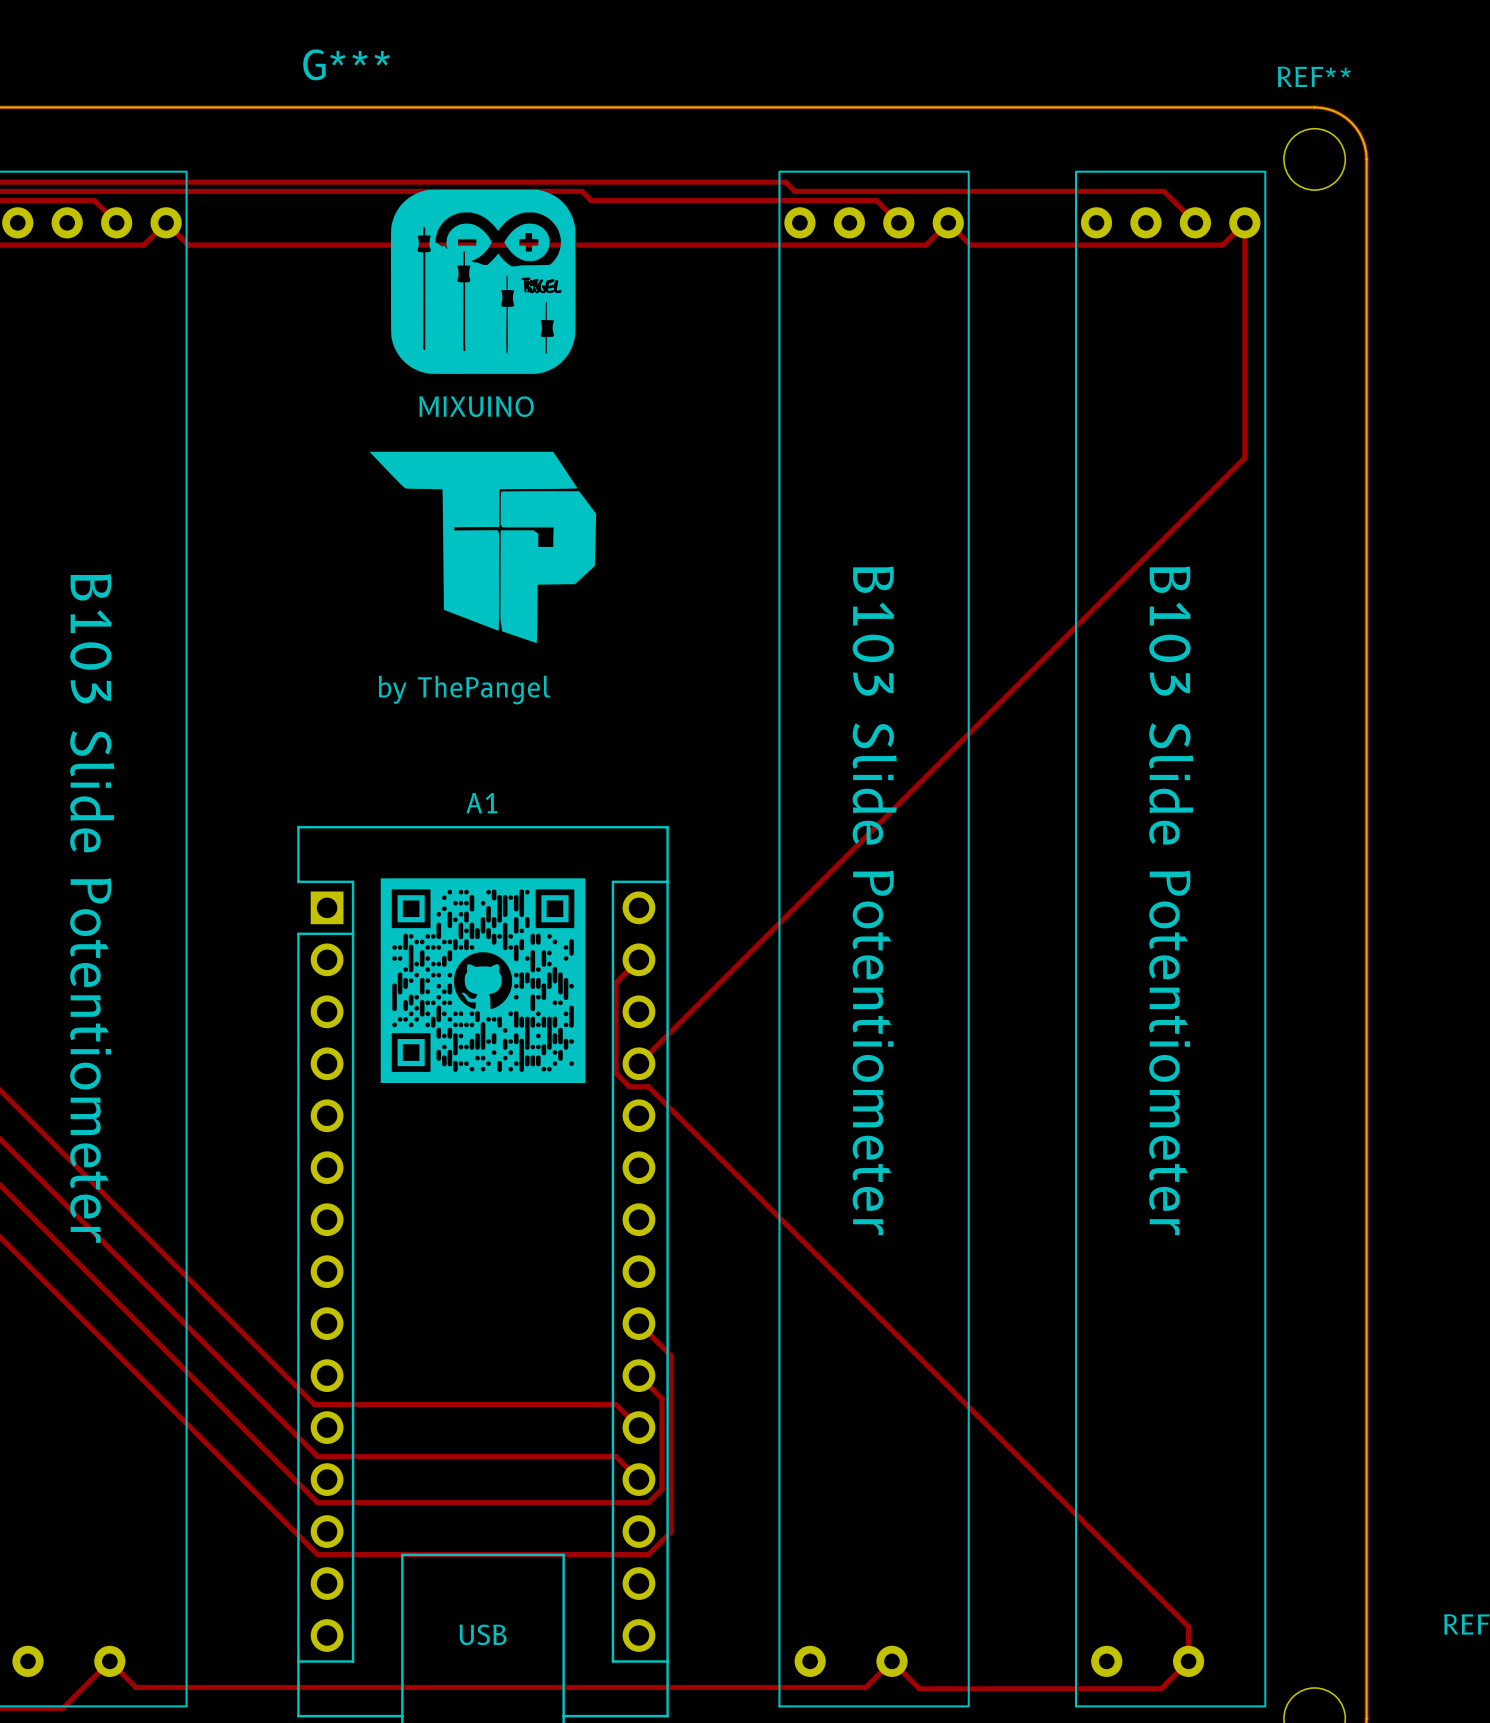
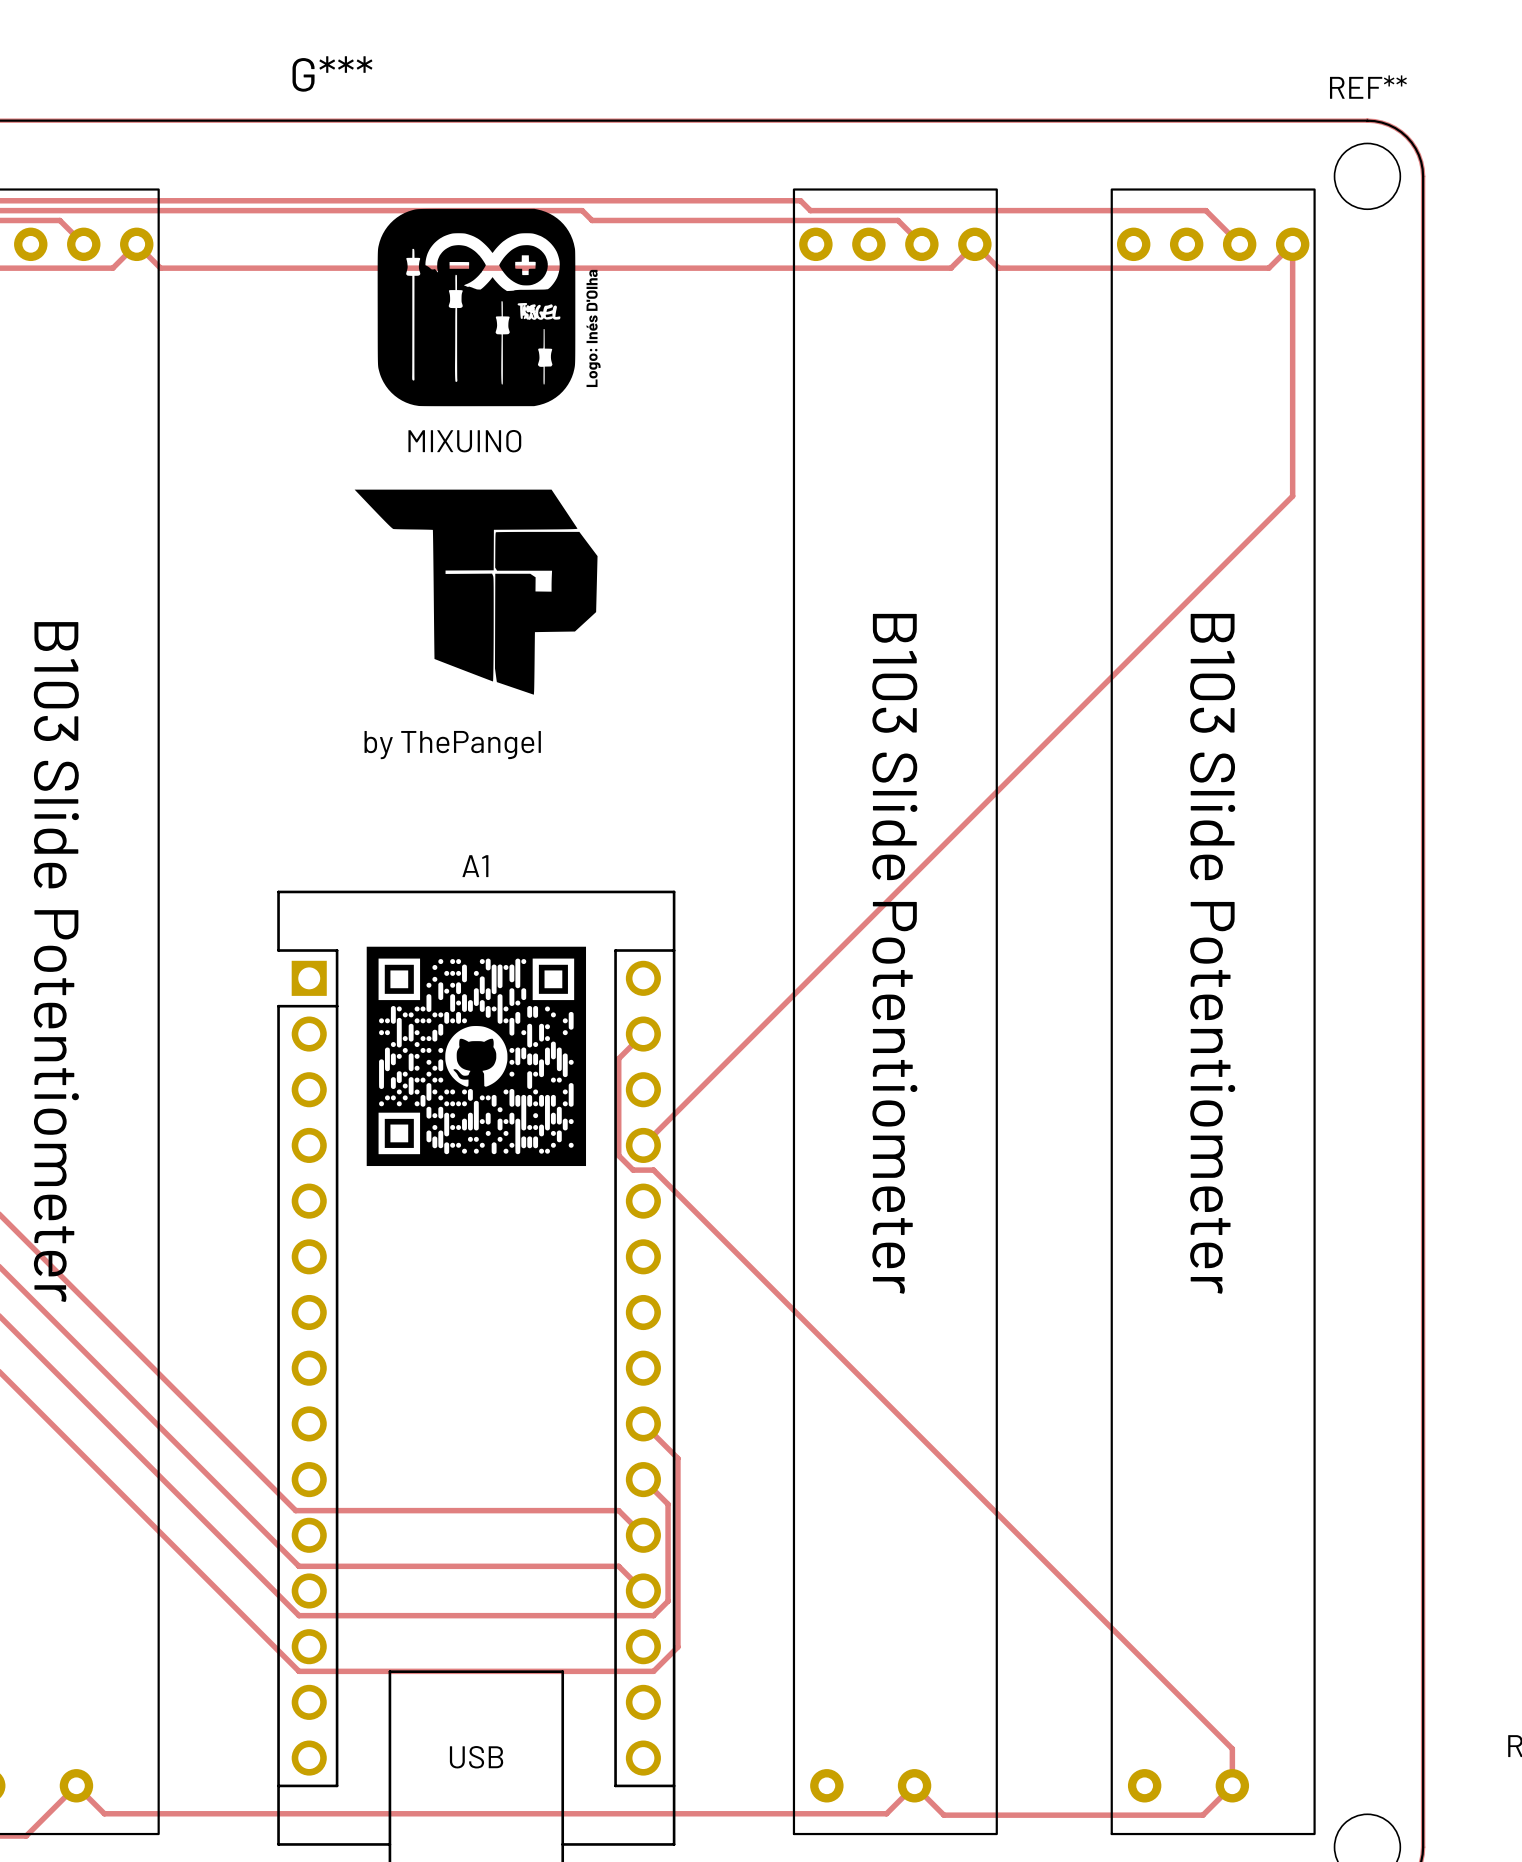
text: none -> Logo: Inés D'Olha (593, 328)

